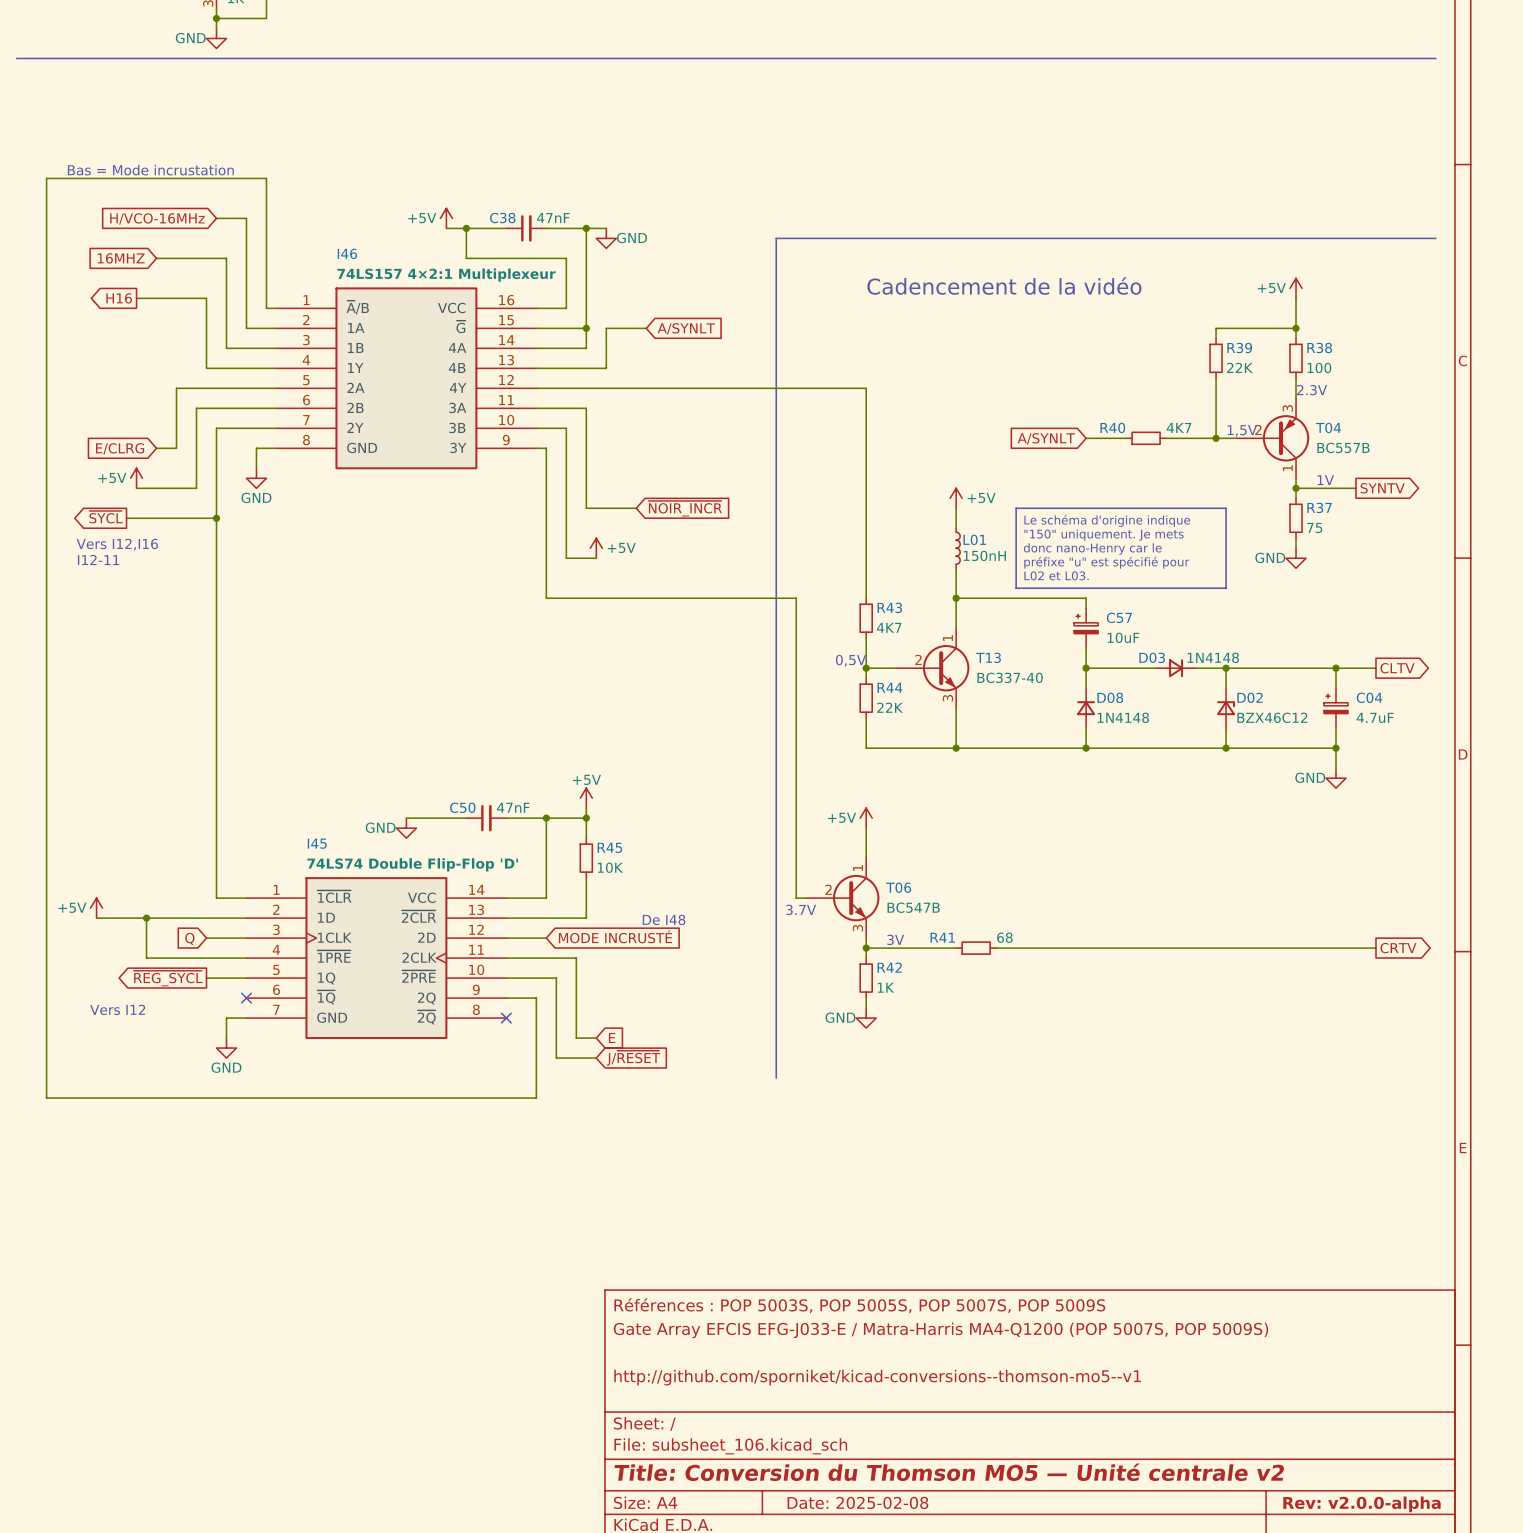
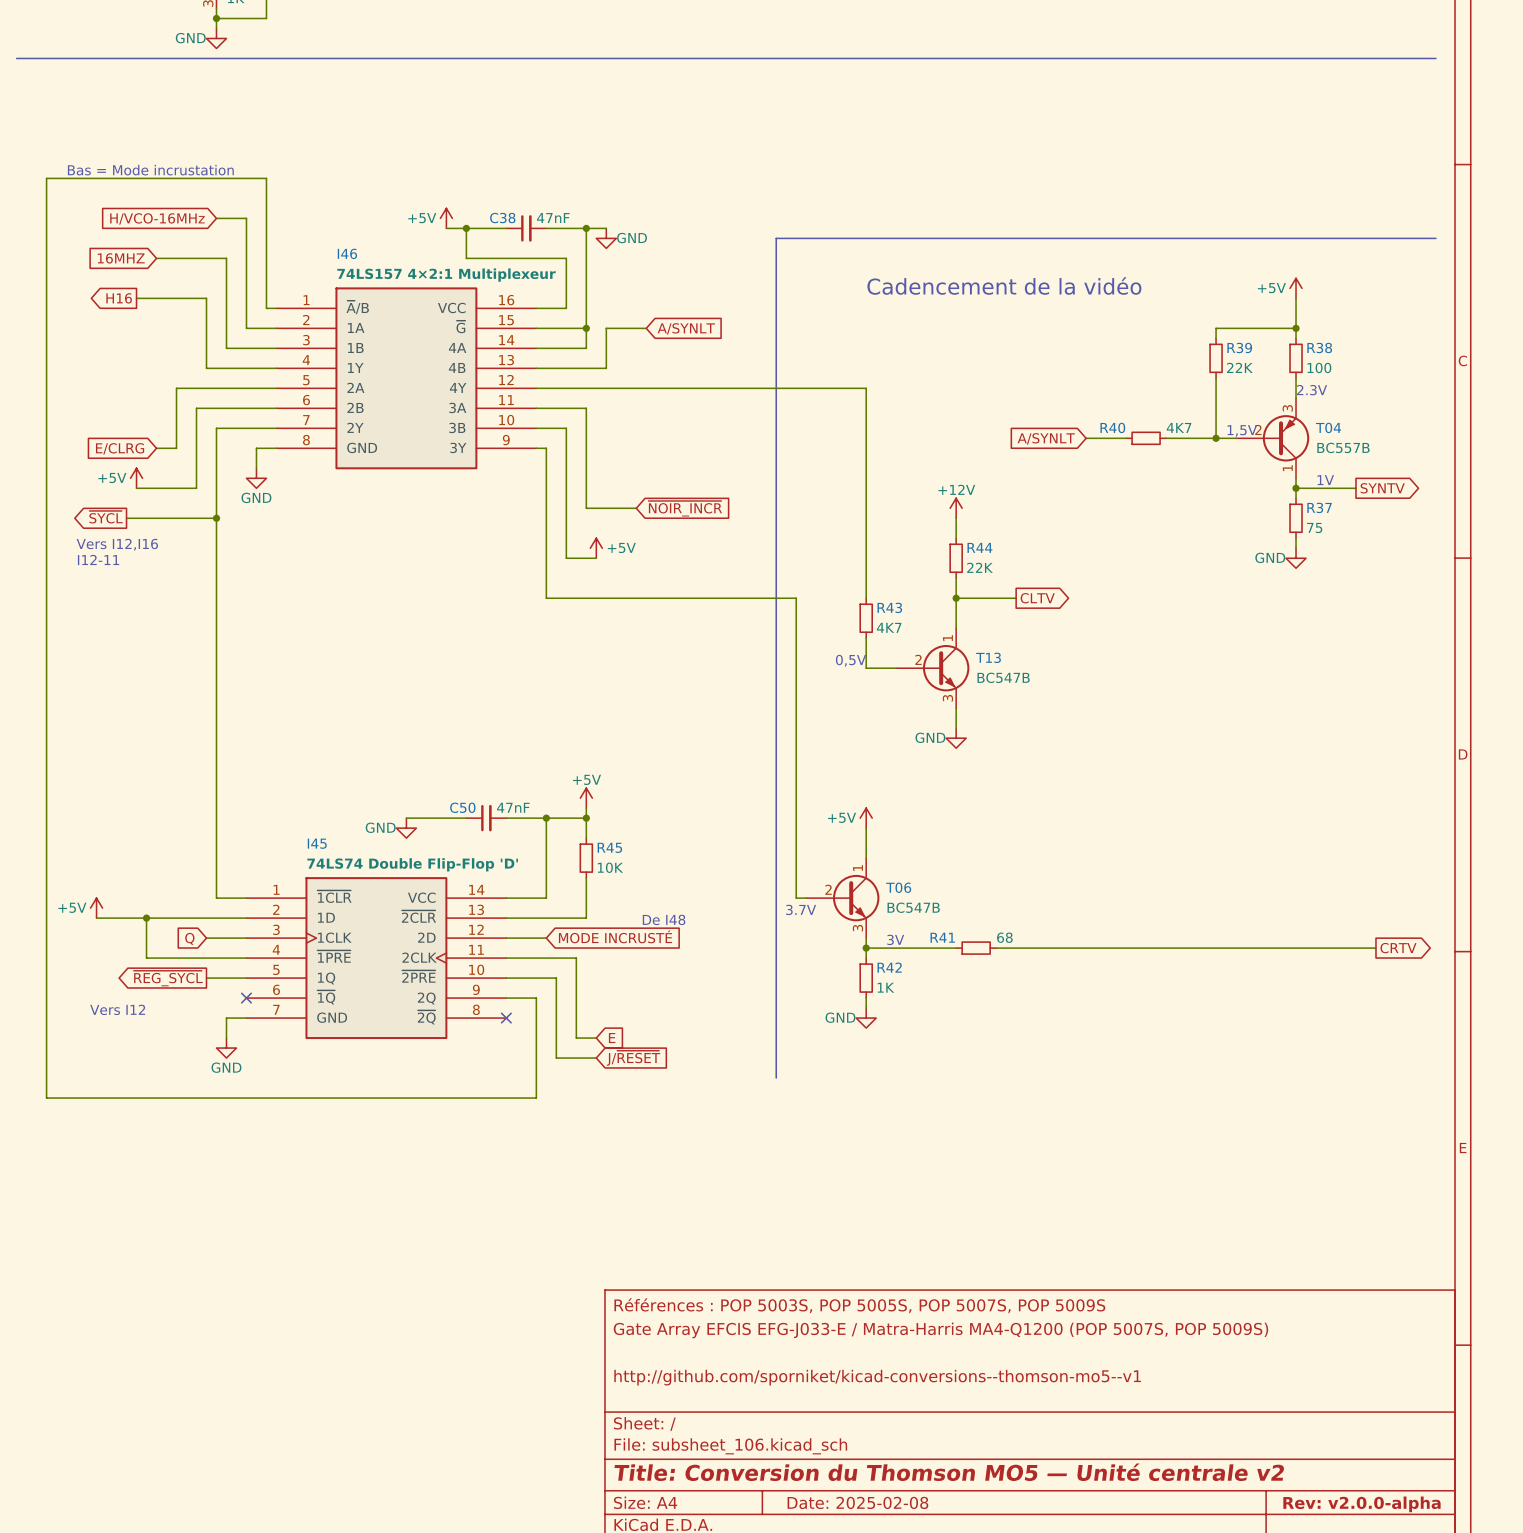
power symbol: +5V (956, 498) -> none
power symbol: none -> +12V (956, 508)
line: (1016, 508) (1226, 508) (1226, 588) (1016, 588) (1016, 508) -> none
text: Le schéma d'origine indique (1107, 520) -> none
text: "150" uniquement. Je mets (1104, 535) -> none
L01: 150nH (958, 548) -> none
text: donc nano-Henry car le (1092, 549) -> none
text: préfixe "u" est spécifié pour (1106, 562) -> none
text: L02 et L03. (1056, 575) -> none
wire: (1016, 598) (1086, 598) (1086, 608) -> none
global label: none -> CLTV (1037, 598)
C57: 10uF (1086, 628) -> none
wire: (1086, 648) (1086, 688) -> none
wire: (866, 668) (866, 678) -> none
junction: (866, 668) -> none
wire: (1086, 668) (1156, 668) -> none
junction: (1086, 668) -> none
D03: 1N4148 (1176, 668) -> none
wire: (1196, 668) (1375, 668) -> none
wire: (1226, 668) (1226, 688) -> none
junction: (1226, 668) -> none
wire: (1336, 668) (1336, 688) -> none
junction: (1336, 668) -> none
global label: CLTV (1397, 668) -> none
T13 value: BC337-40 (1010, 677) -> BC547B (1003, 677)
R44 position: (866, 698) -> (956, 558)
D08: 1N4148 (1086, 708) -> none
D02: BZX46C12 (1226, 708) -> none
C04: 4.7uF (1336, 708) -> none
wire: (866, 718) (866, 748) (1336, 748) -> none
wire: (1086, 728) (1086, 748) -> none
wire: (1226, 728) (1226, 748) -> none
wire: (1336, 728) (1336, 768) -> none
power symbol: none -> GND (956, 738)
junction: (956, 748) -> none
junction: (1086, 748) -> none
junction: (1226, 748) -> none
junction: (1336, 748) -> none
power symbol: GND (1336, 778) -> none

